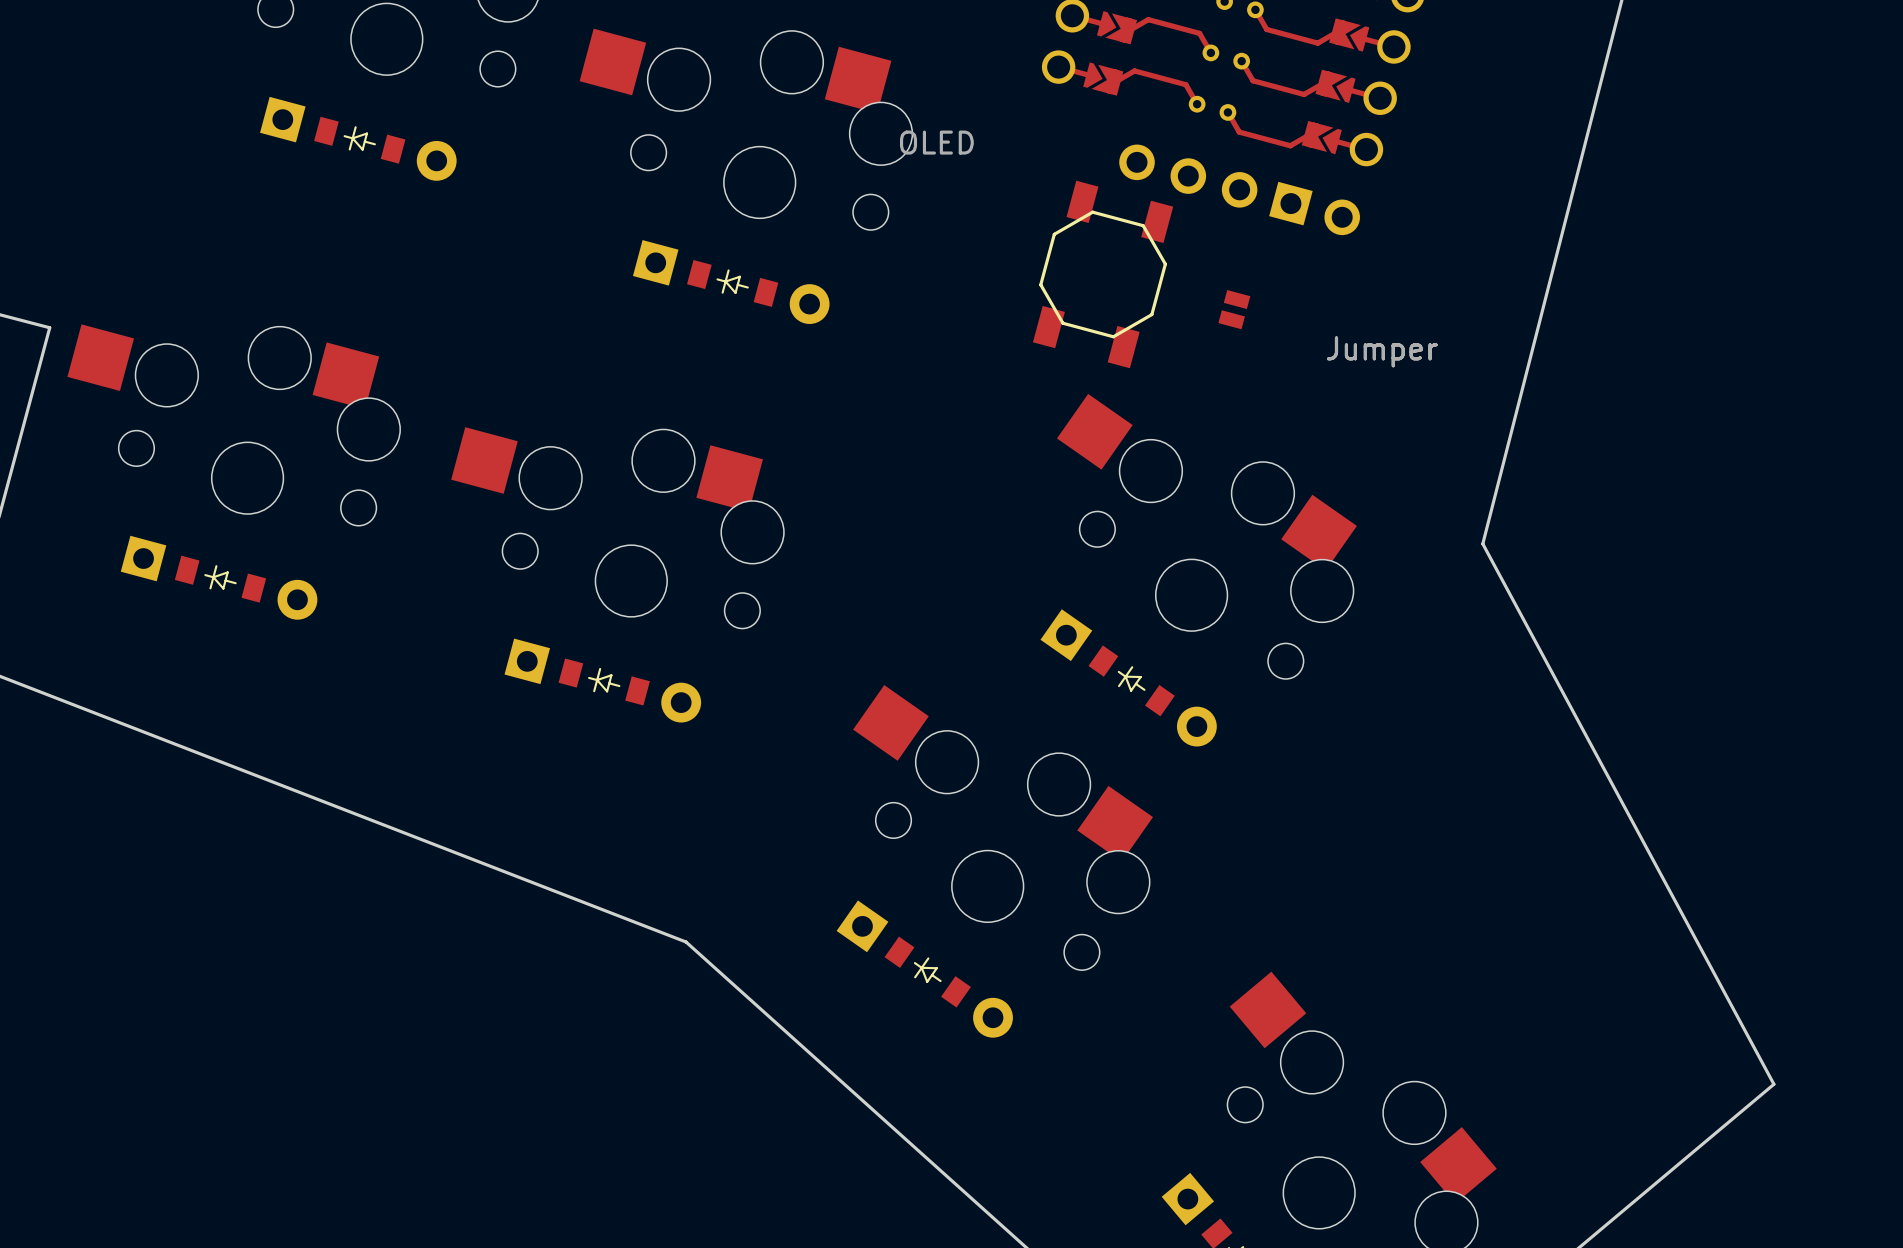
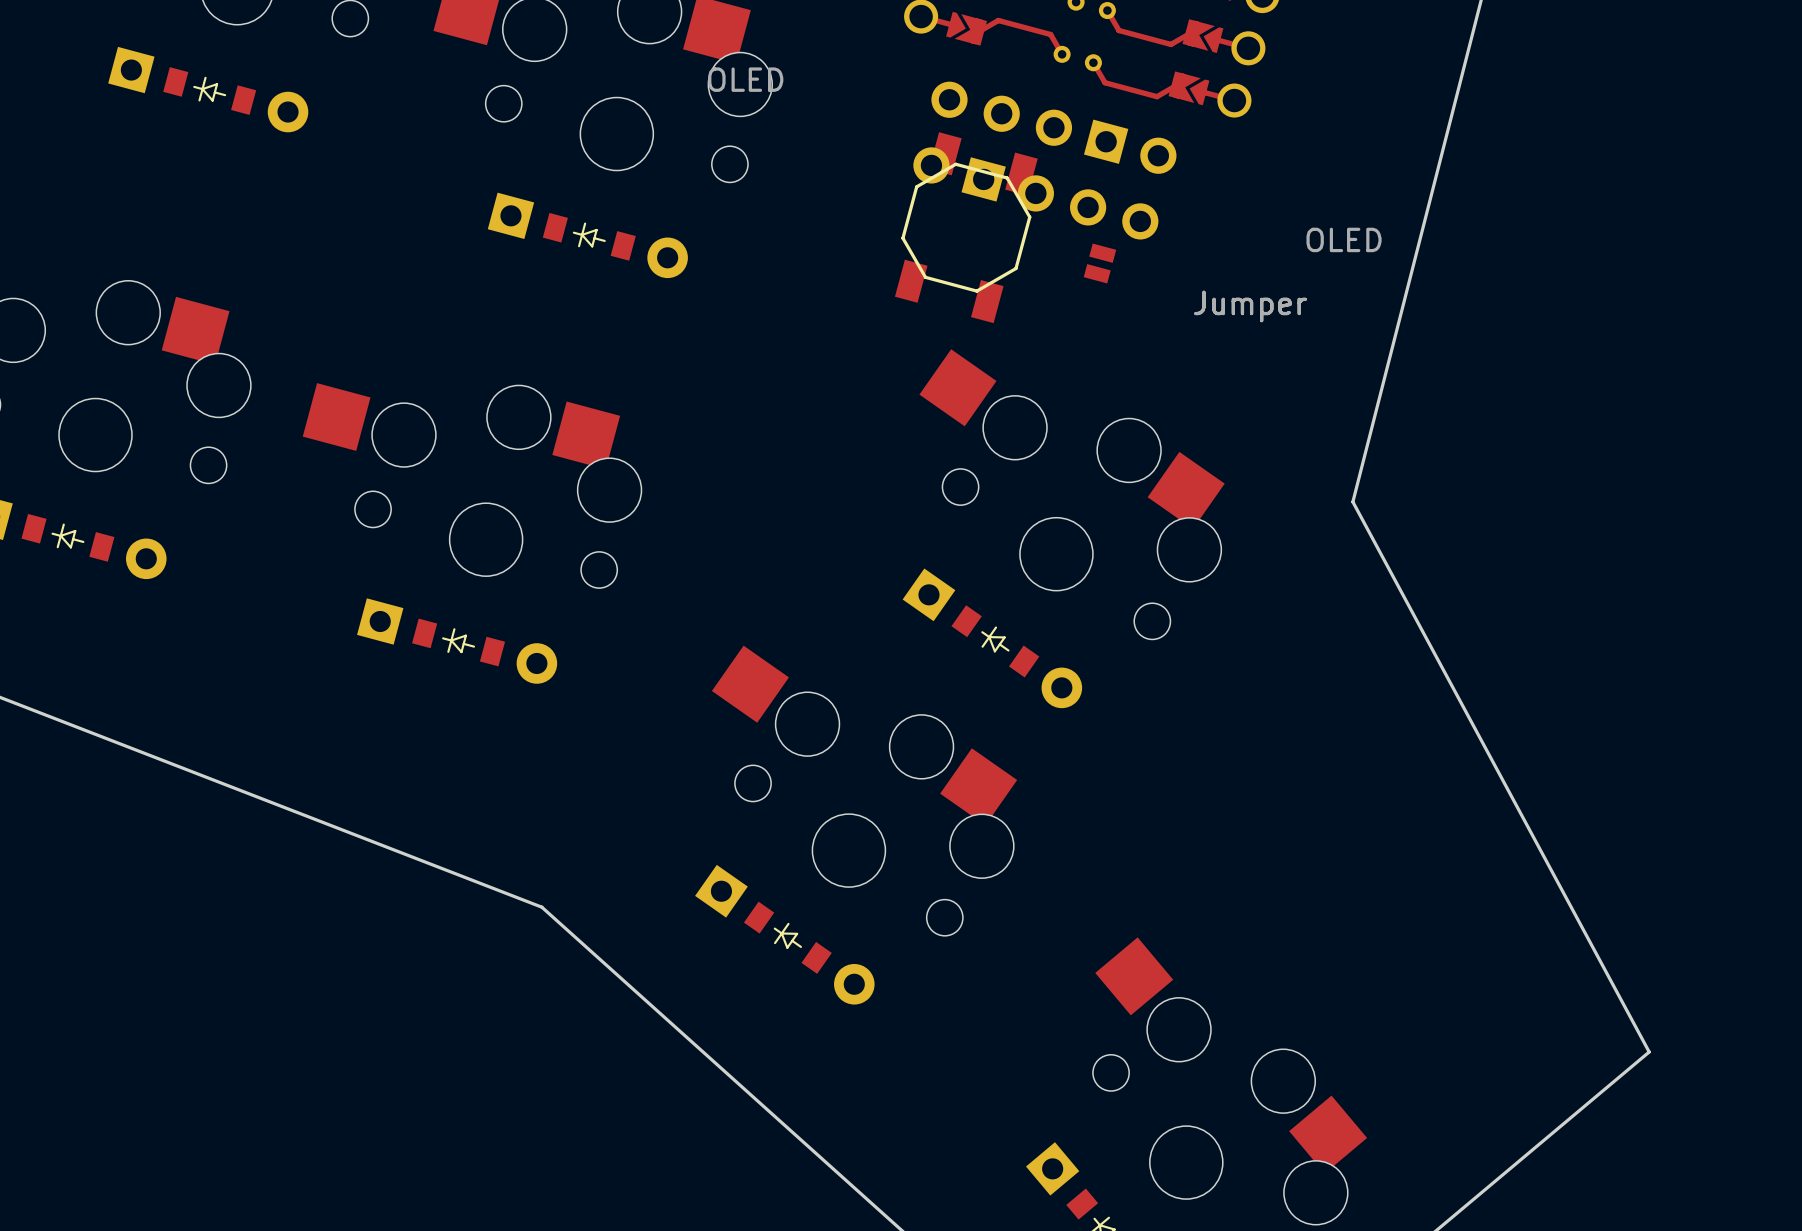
part: none -> OLED (1053, 127)
part: OLED (1239, 189) -> none
part: none -> OLED (1035, 193)

